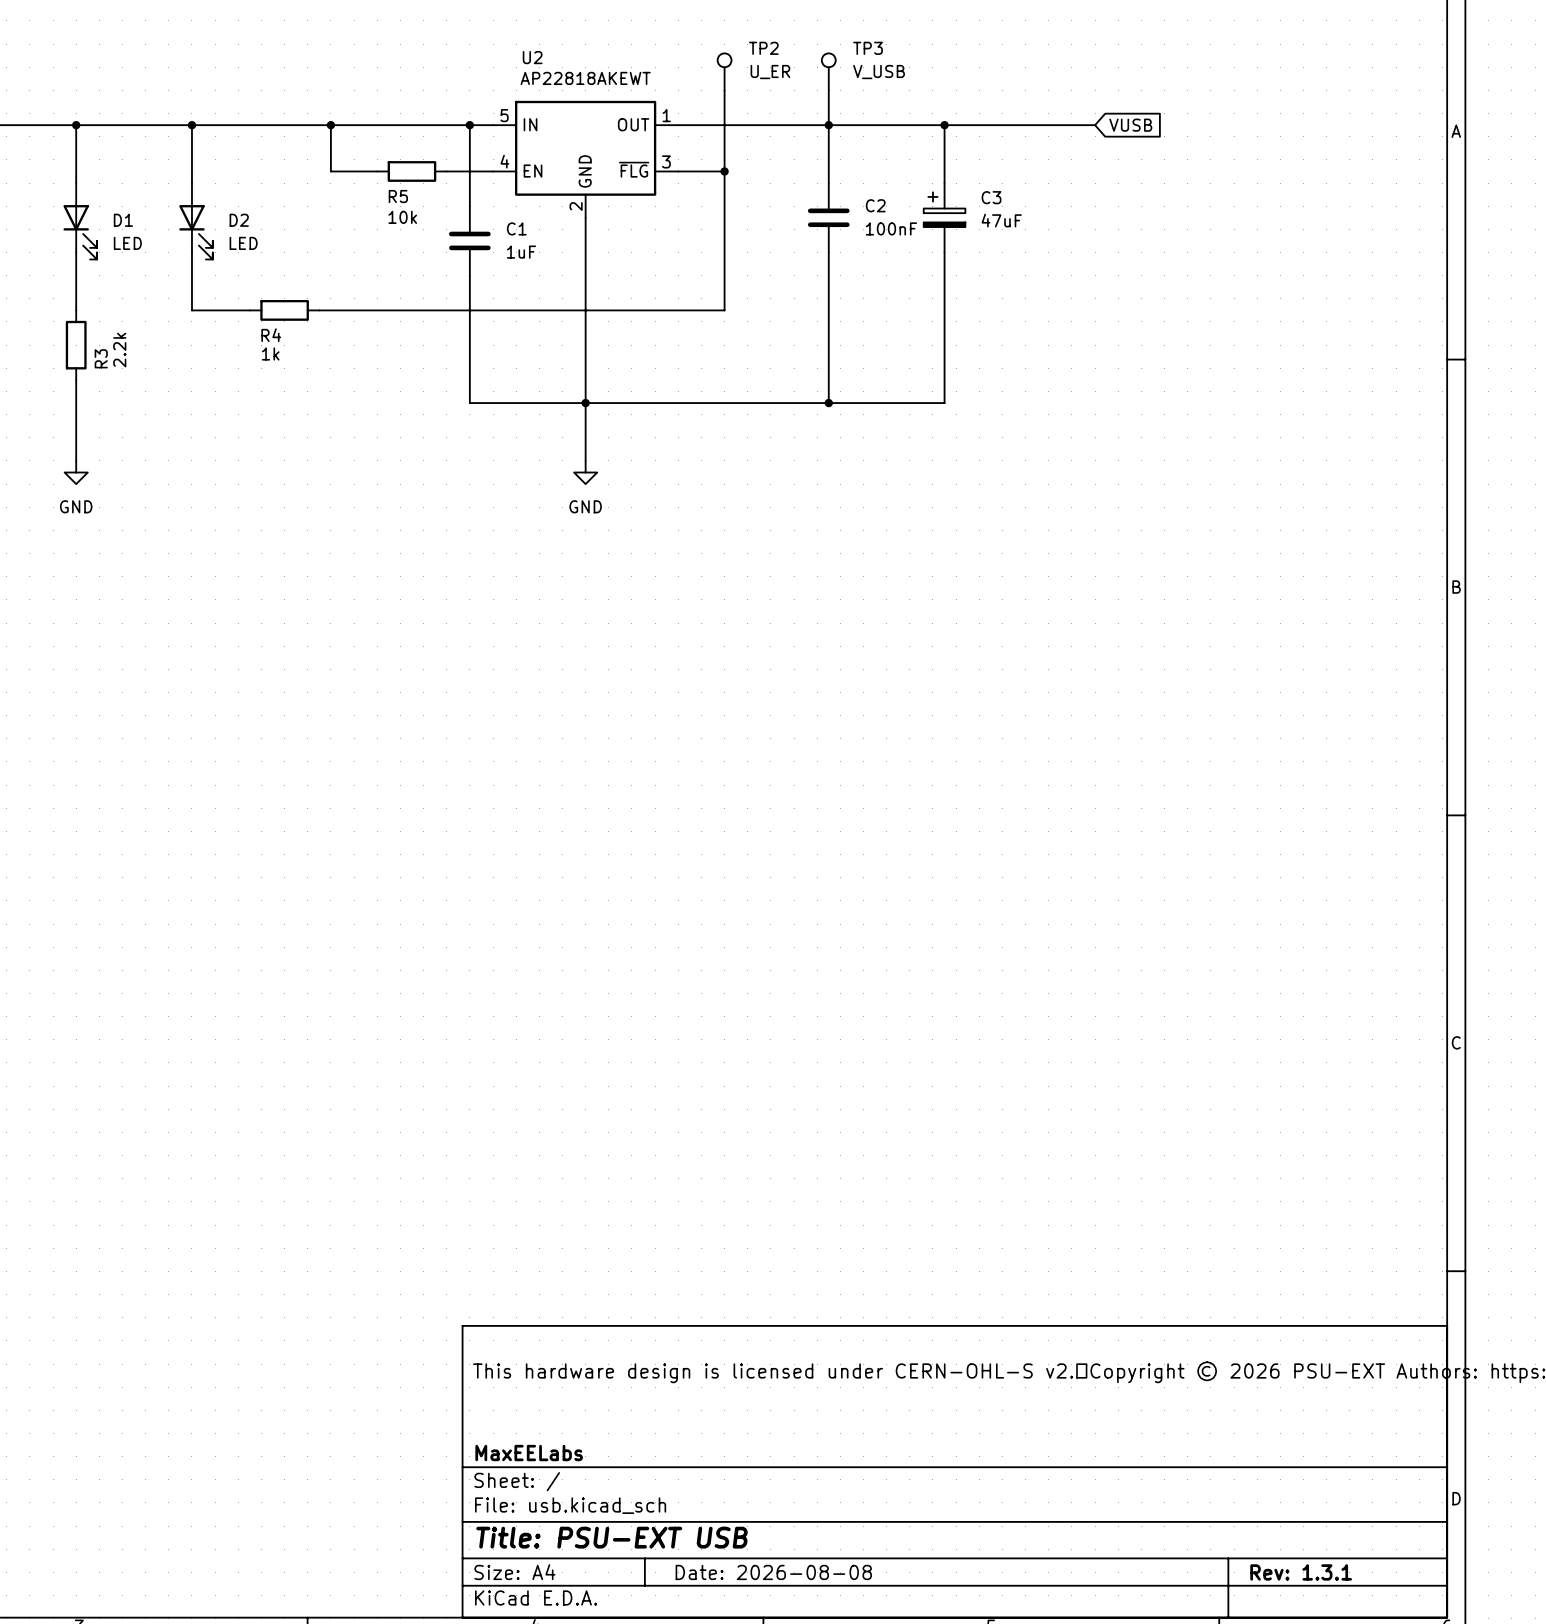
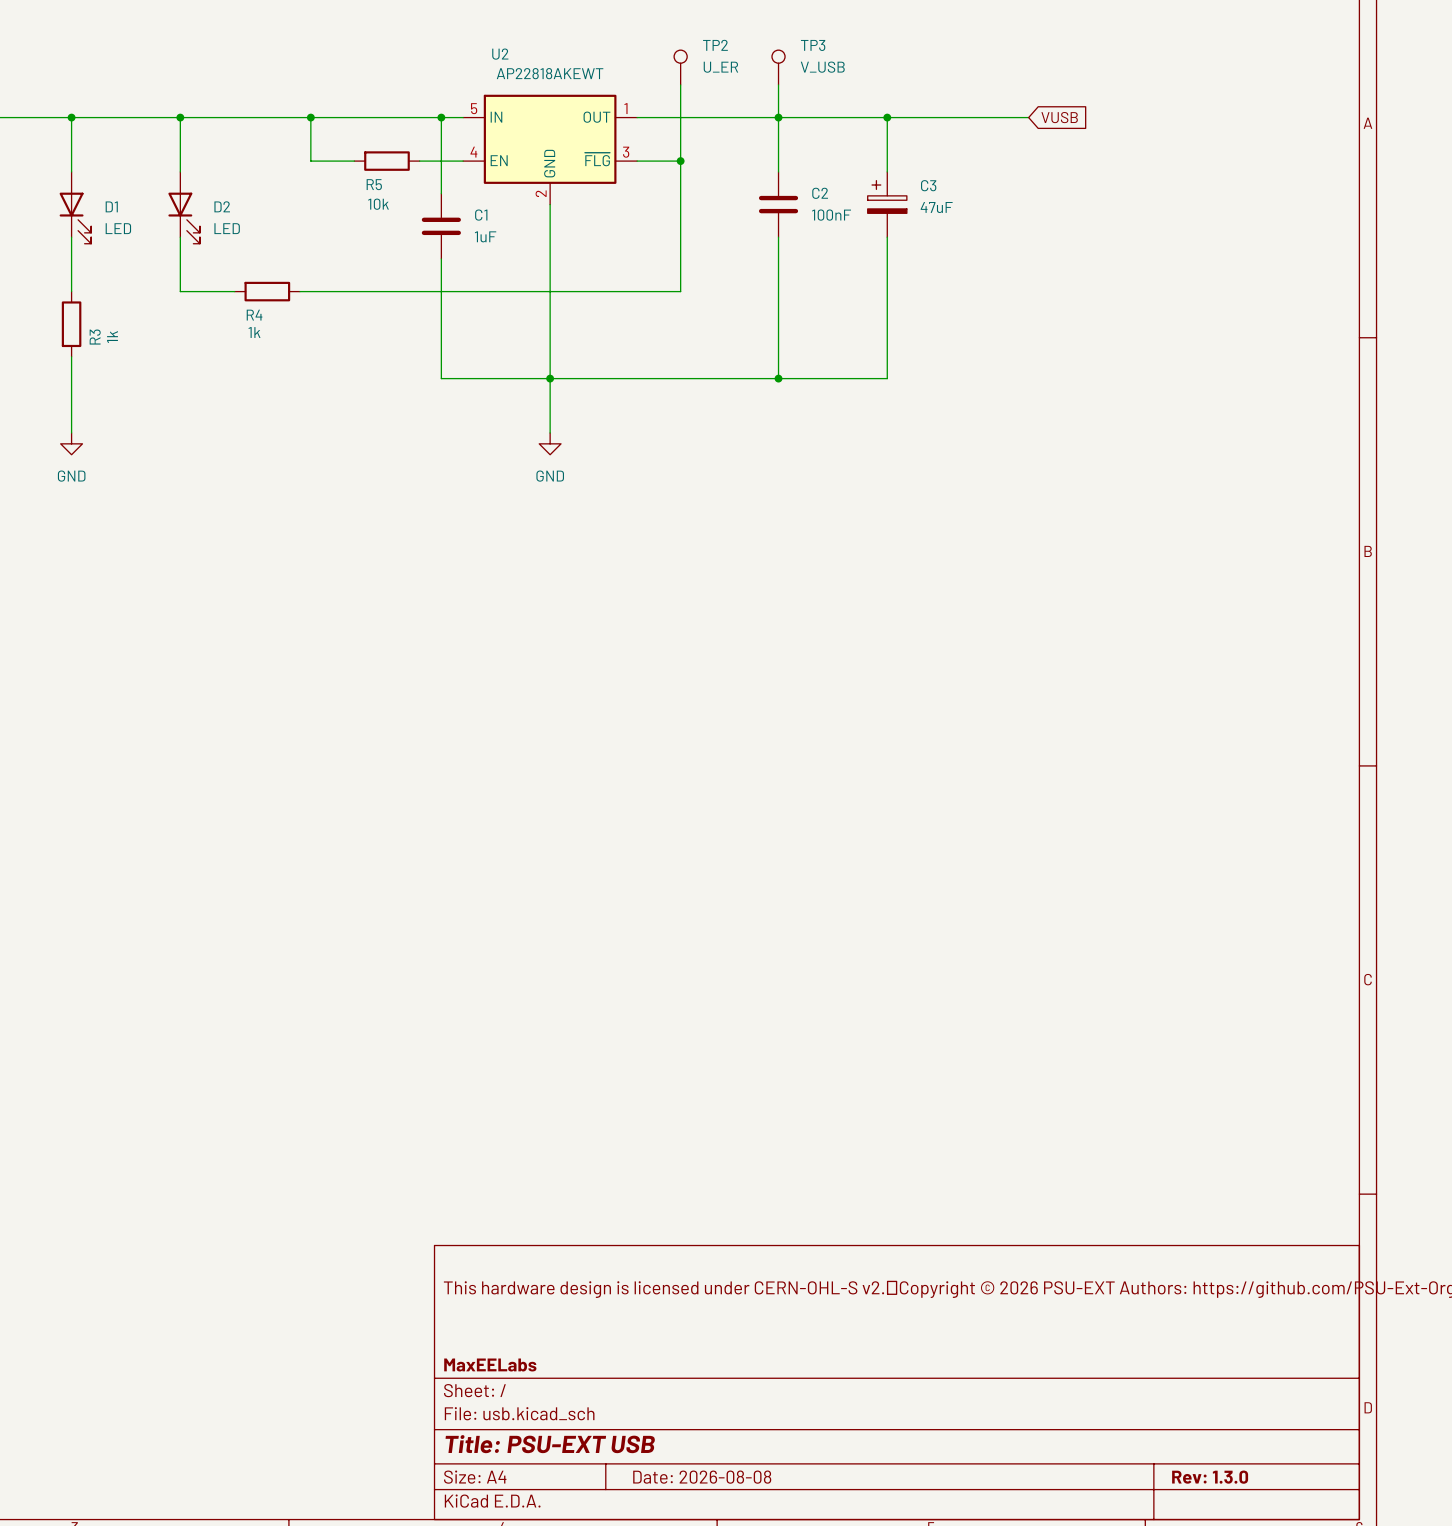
R3 value: 2.2k (119, 350) -> 1k (112, 337)
title block: Rev: 1.3.1 (1301, 1572) -> Rev: 1.3.0 (1210, 1477)

